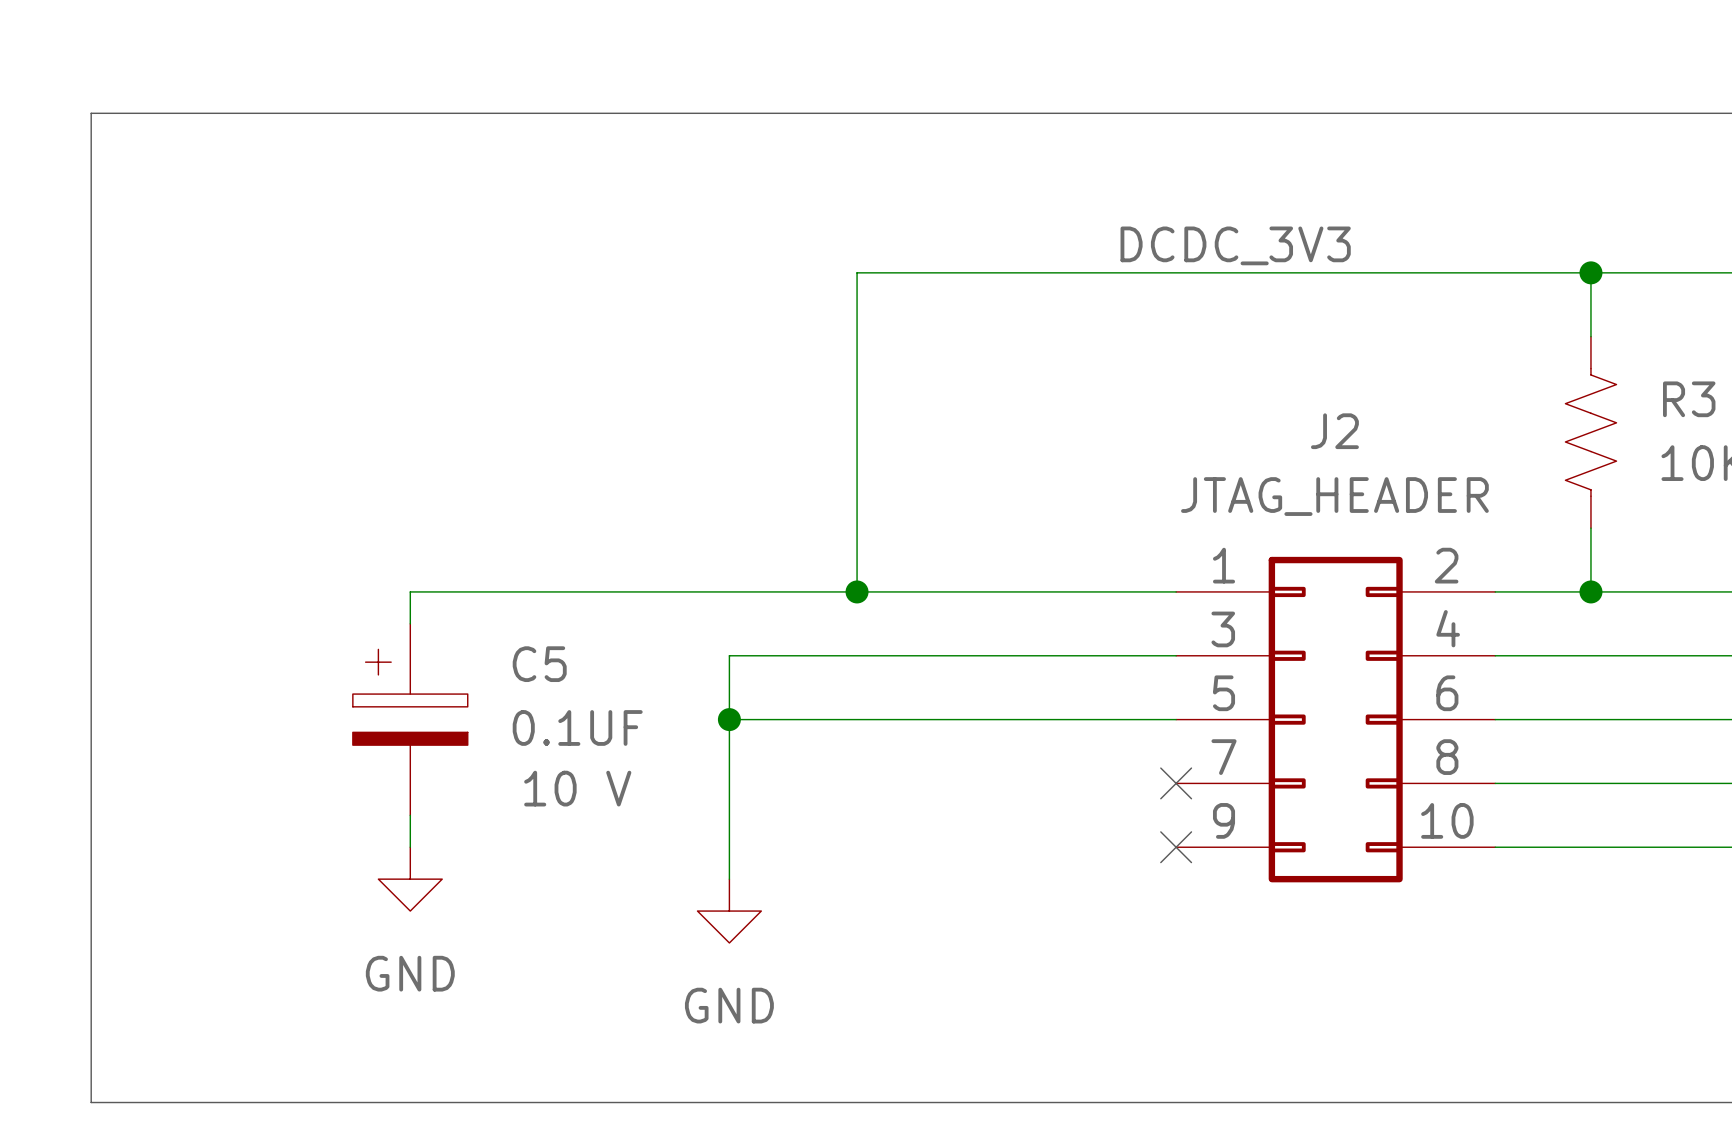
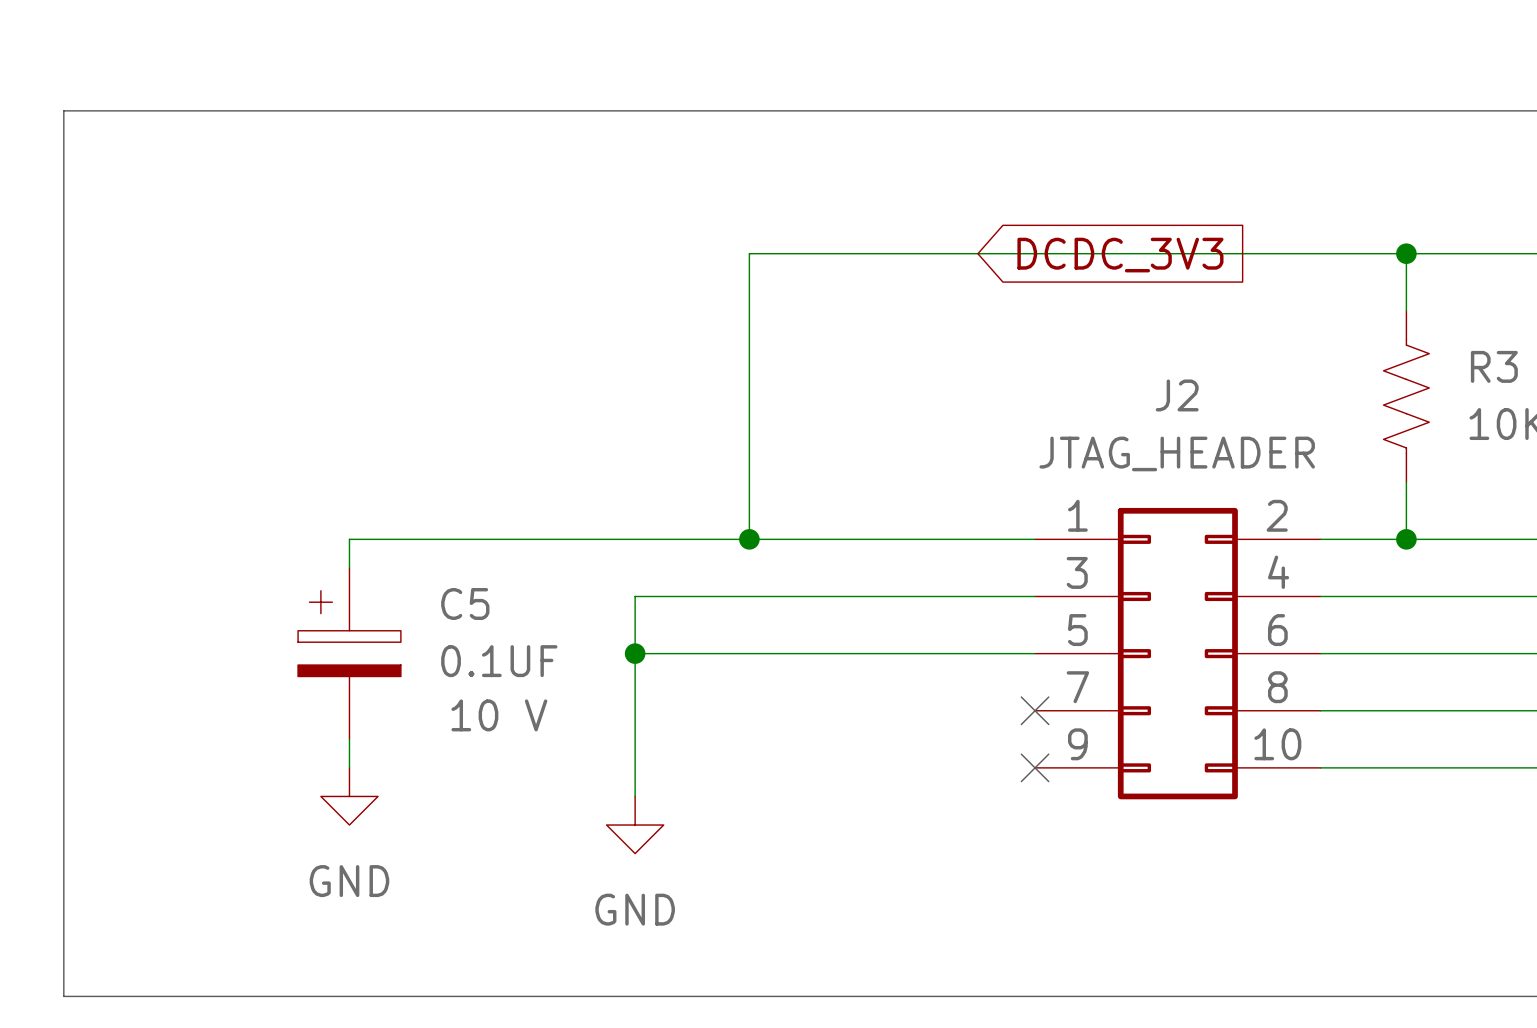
label: DCDC_3V3 (1235, 245) -> none
global label: none -> DCDC_3V3 (1120, 255)

